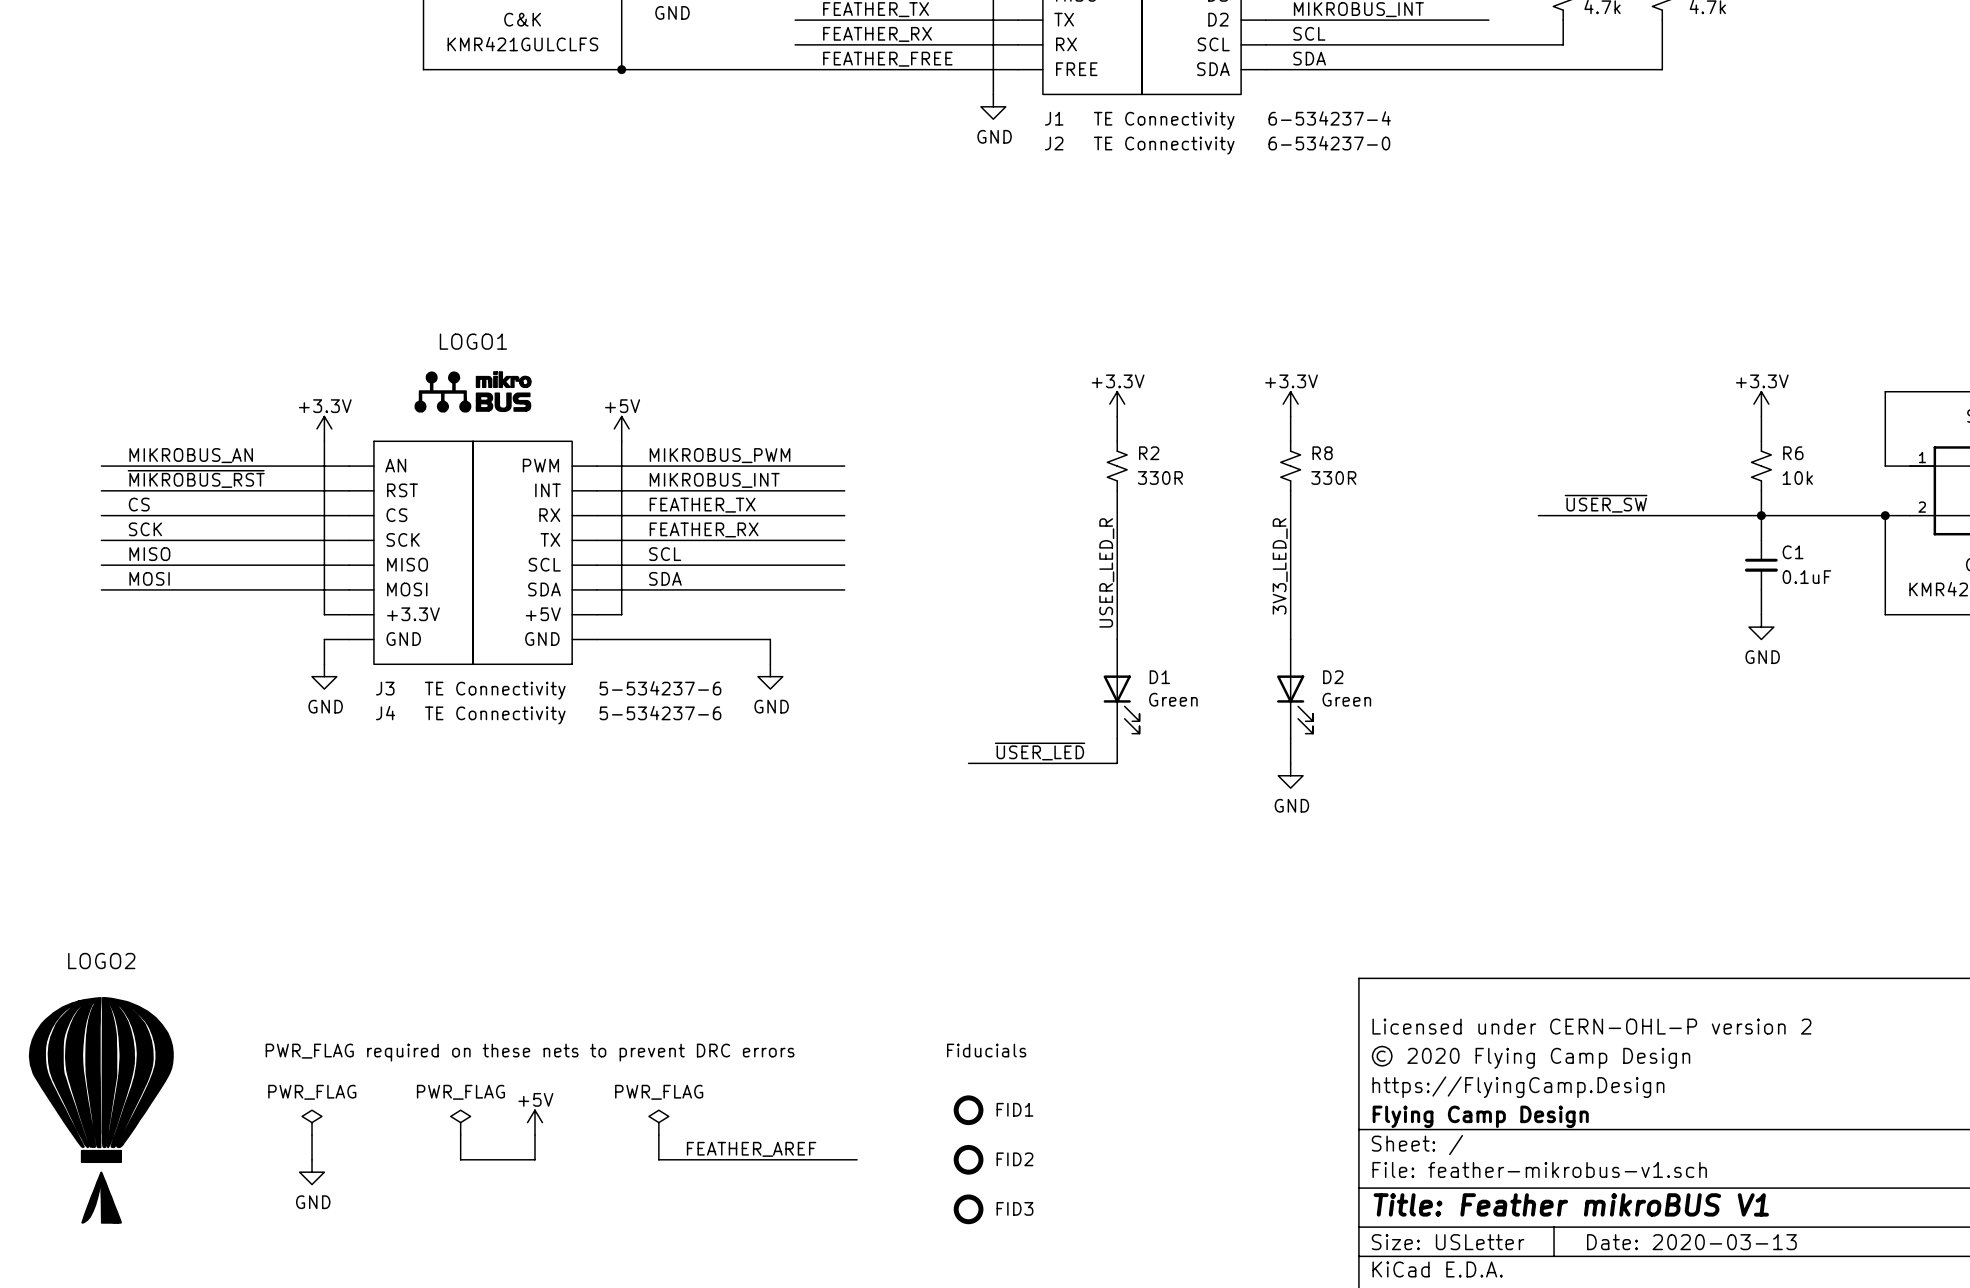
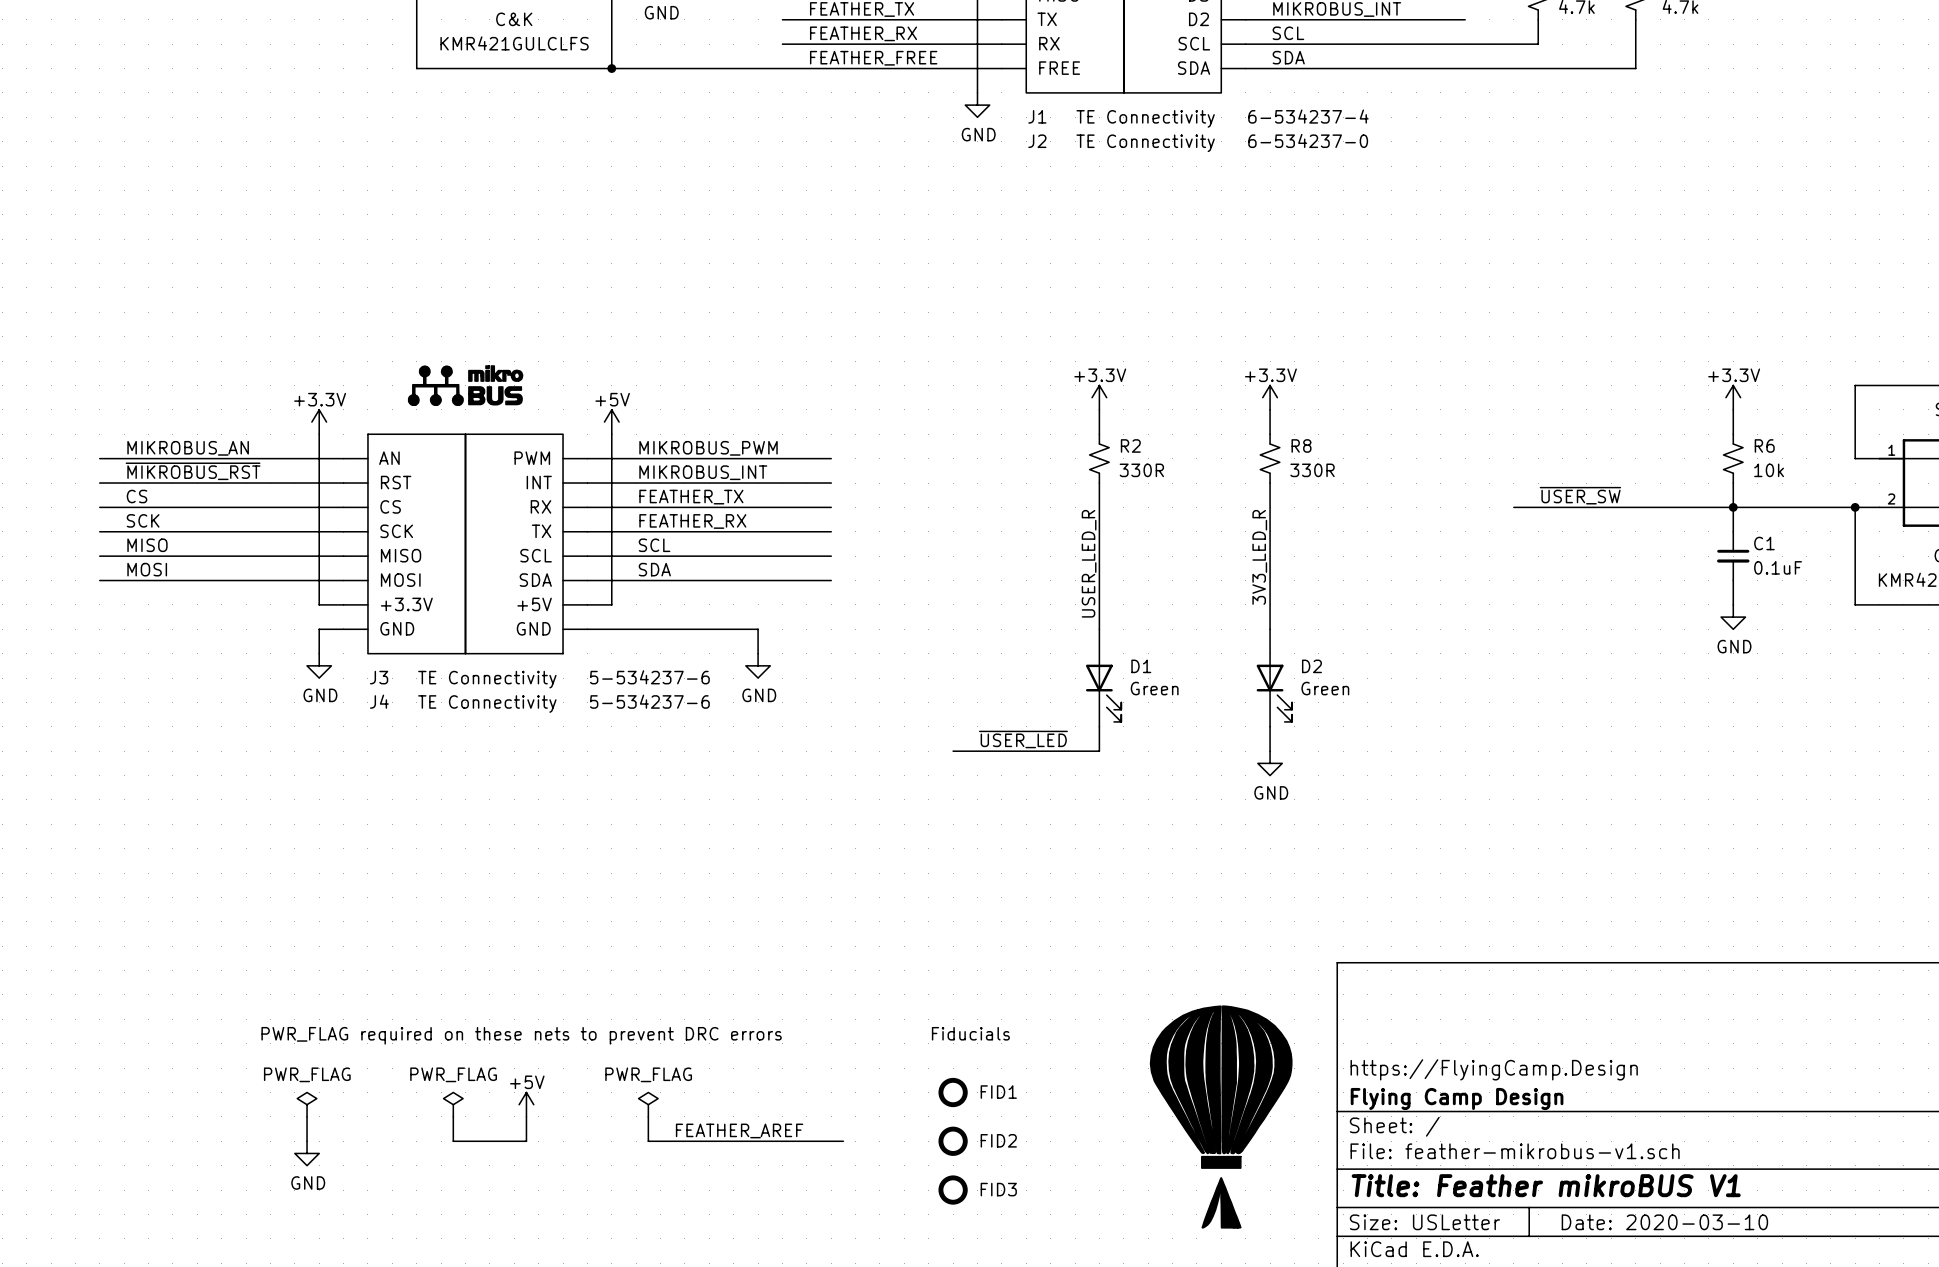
LOGO1 name: LOGO1 (473, 341) -> none
title block: Licensed under CERN-OHL-P version 2 (1591, 1026) -> none
title block: © 2020 Flying Camp Design (1530, 1057) -> none
LOGO2: (101, 1110) -> none
part: none -> (1221, 1117)
title block: Date: 2020-03-13 (1691, 1242) -> Date: 2020-03-10 (1664, 1222)

